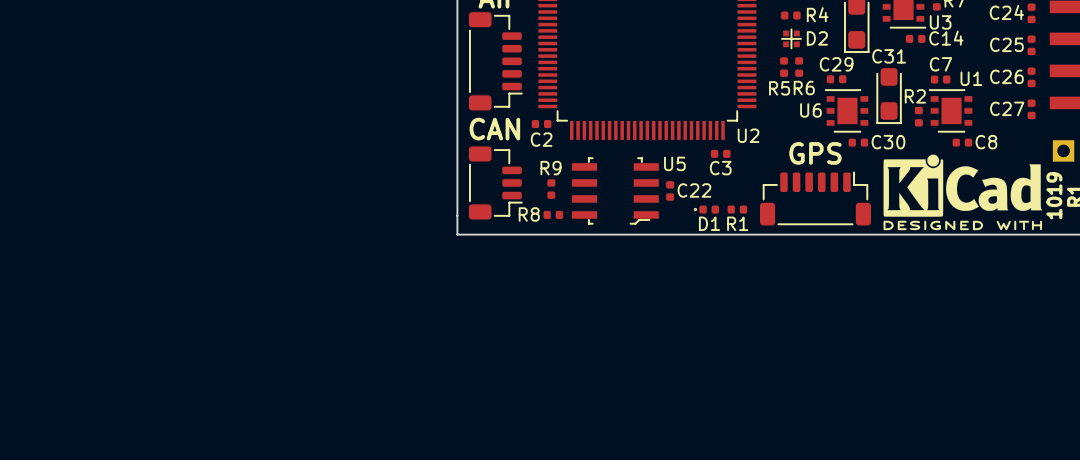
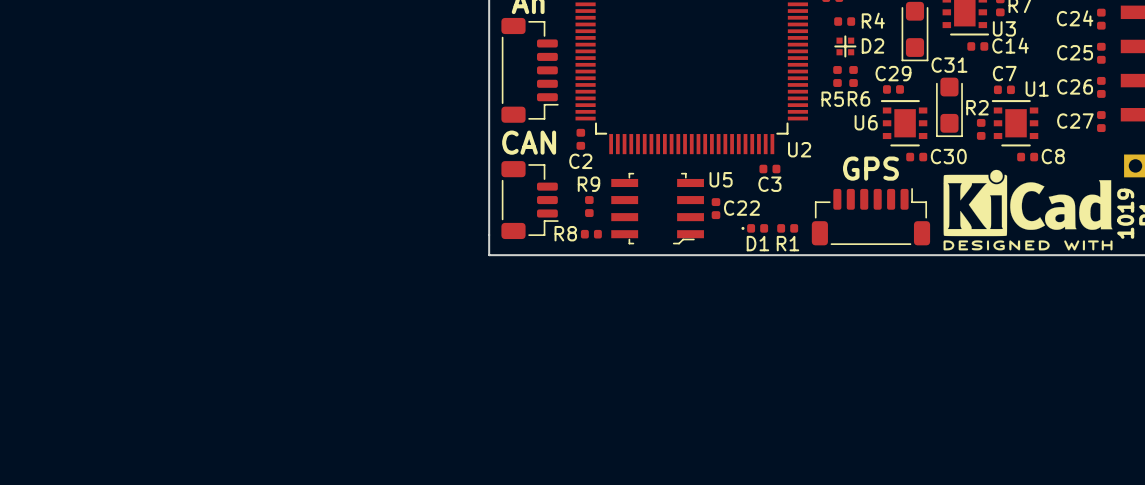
C2 rotation: 0° (541, 124) -> 90° clockwise (580, 139)

